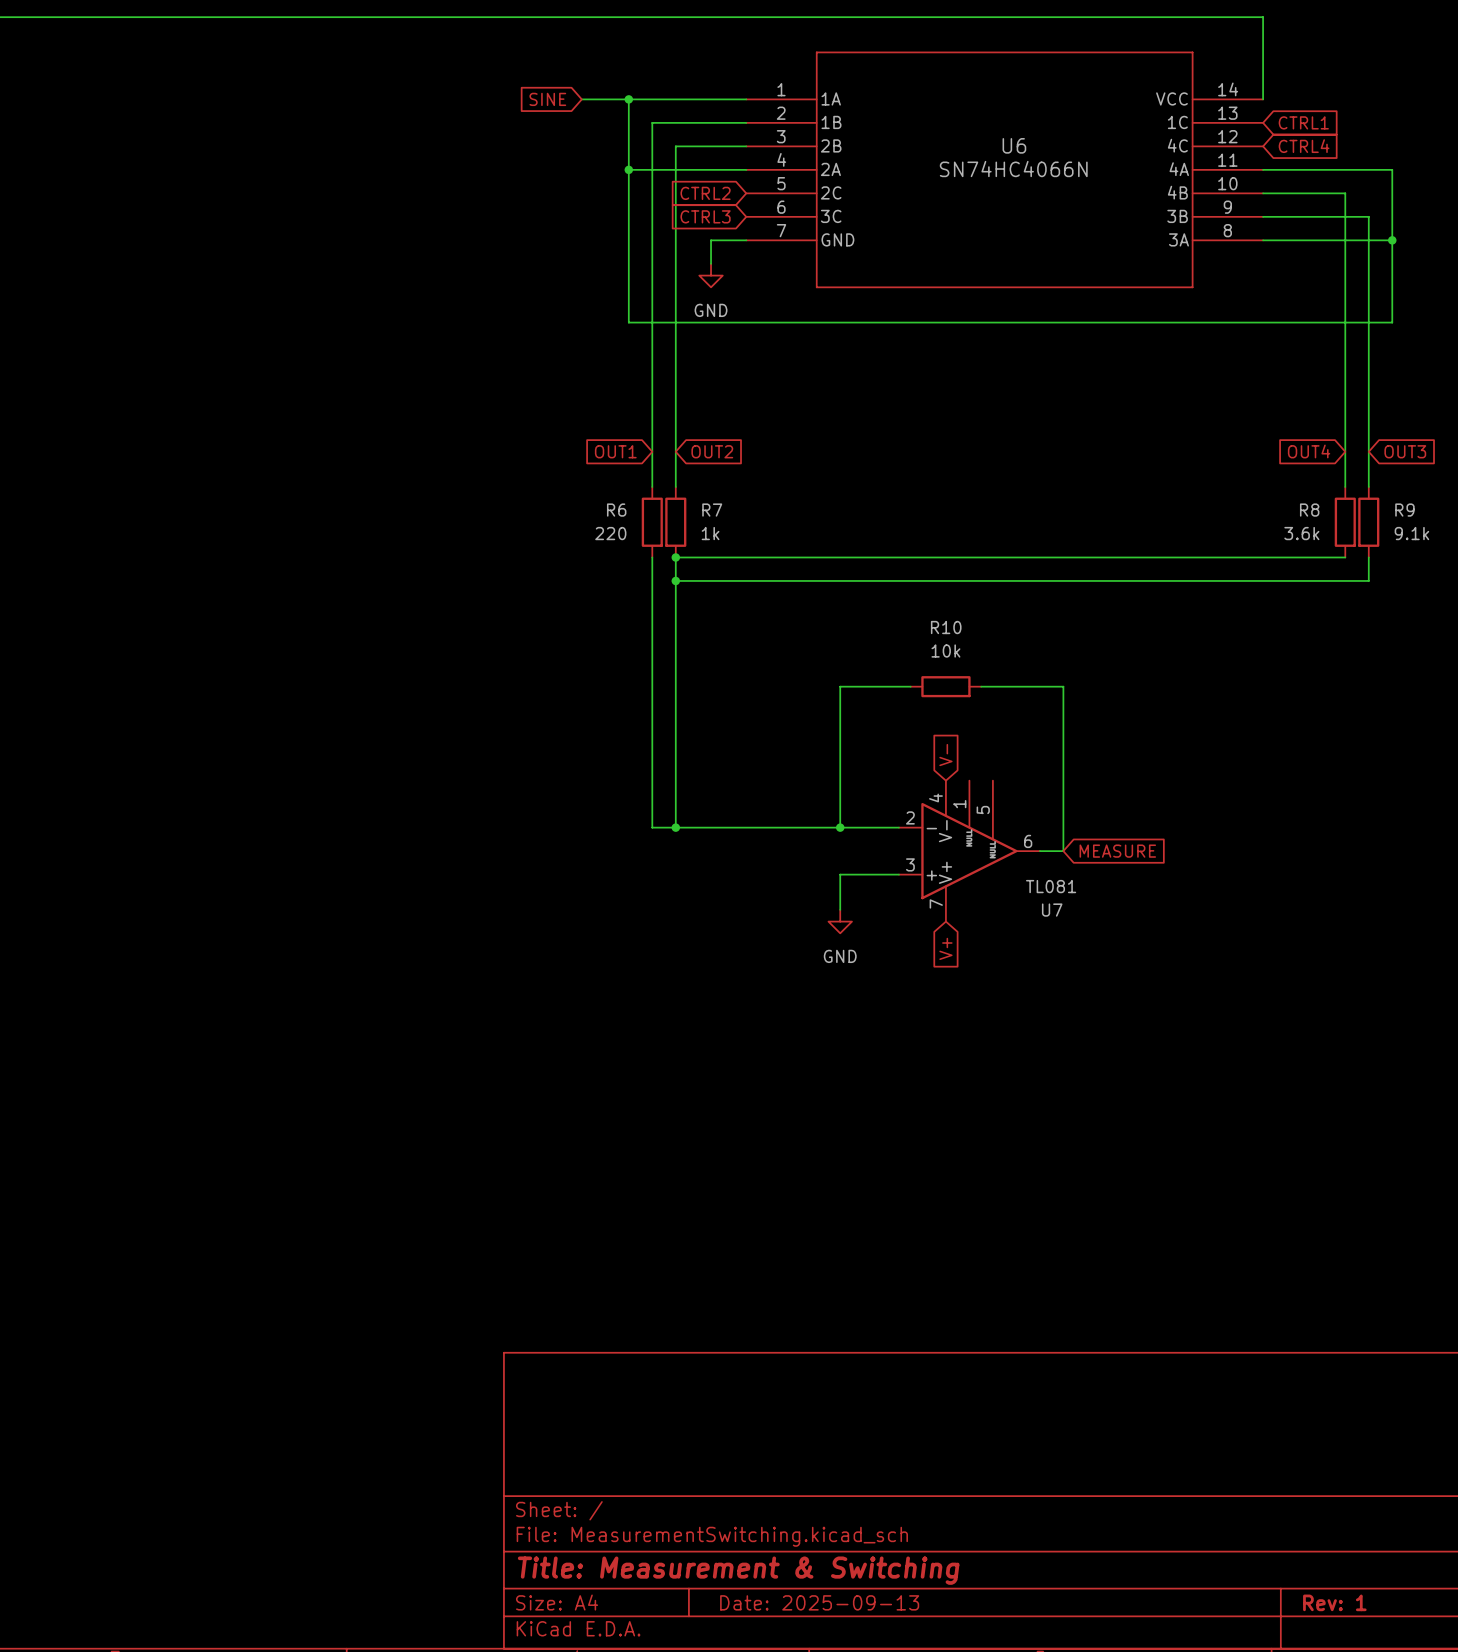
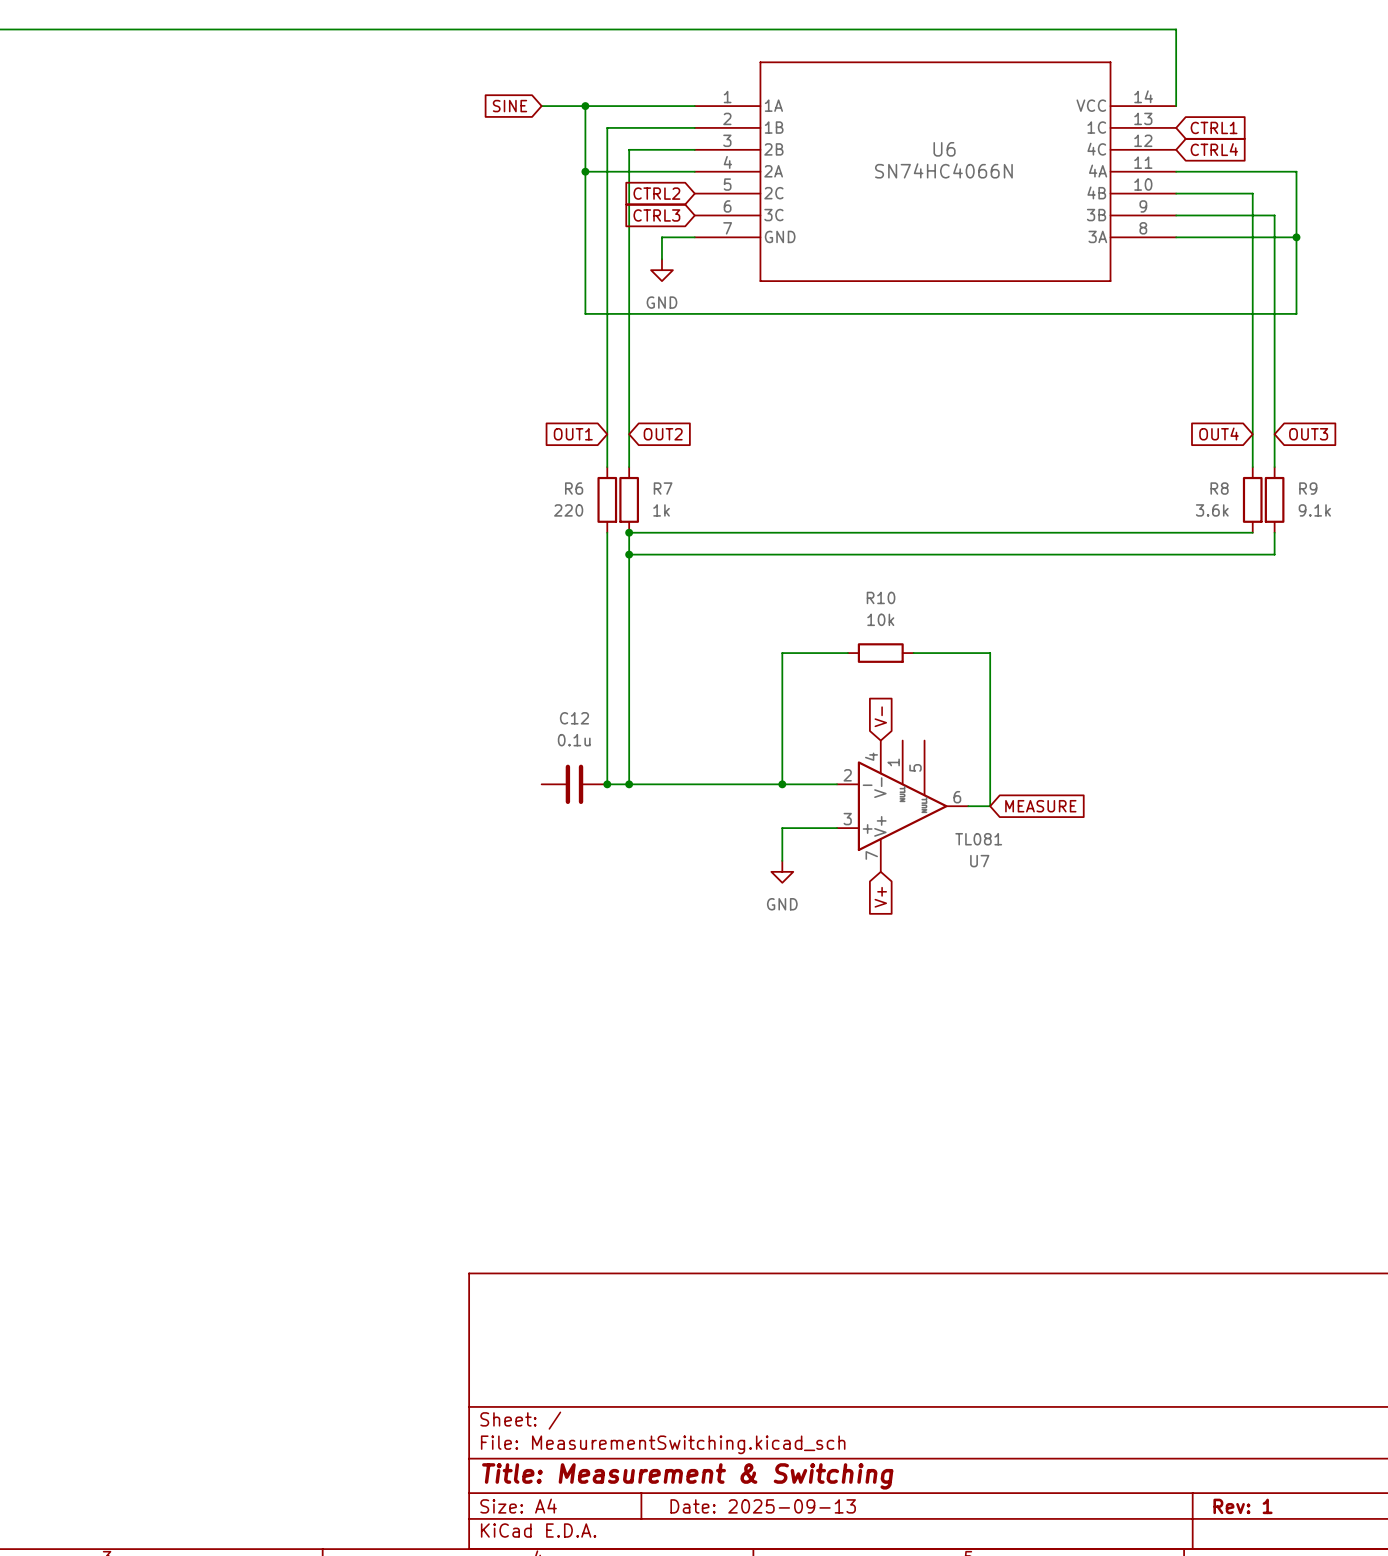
C12: none -> 0.1u (574, 784)
junction: none -> (607, 784)

